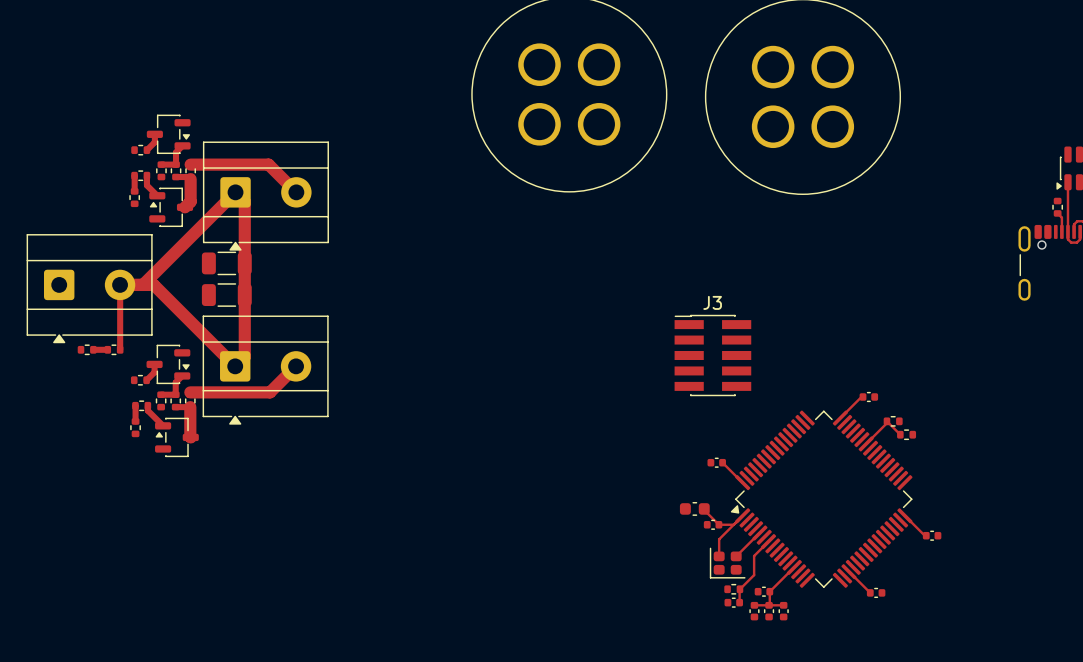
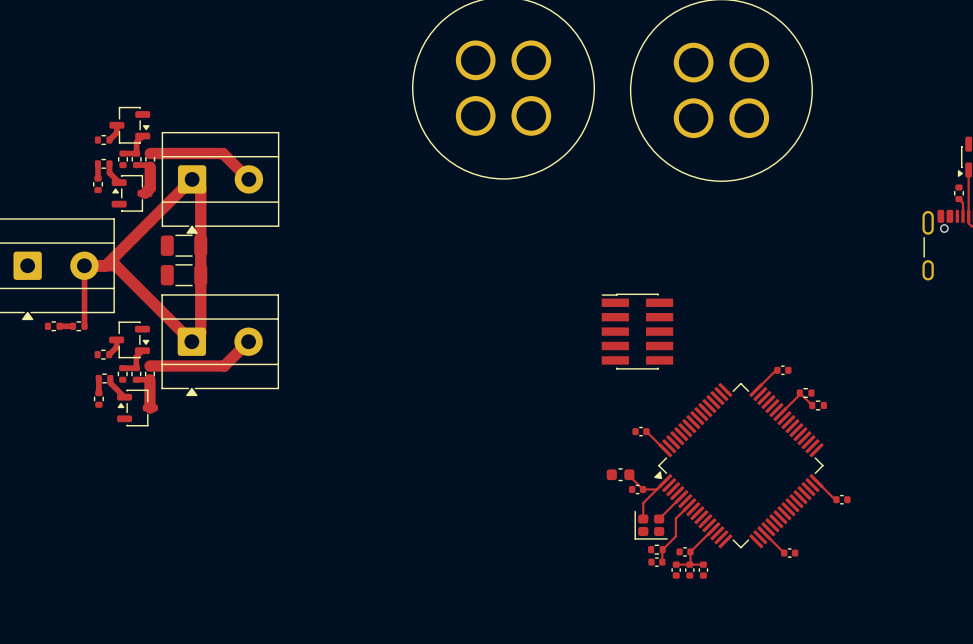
J3 name: J3 (712, 302) -> none

